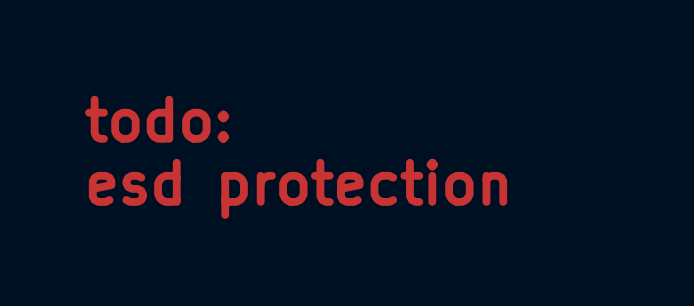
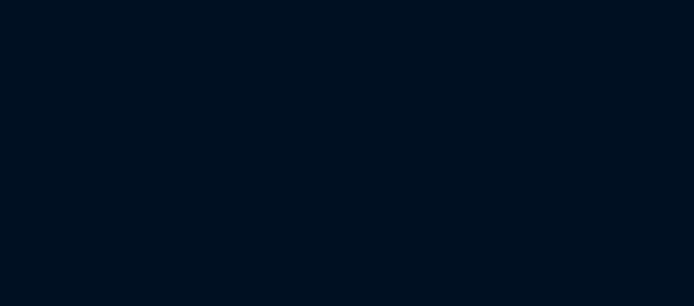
text: todo: (157, 119) -> none
text: esd protection (298, 188) -> none

